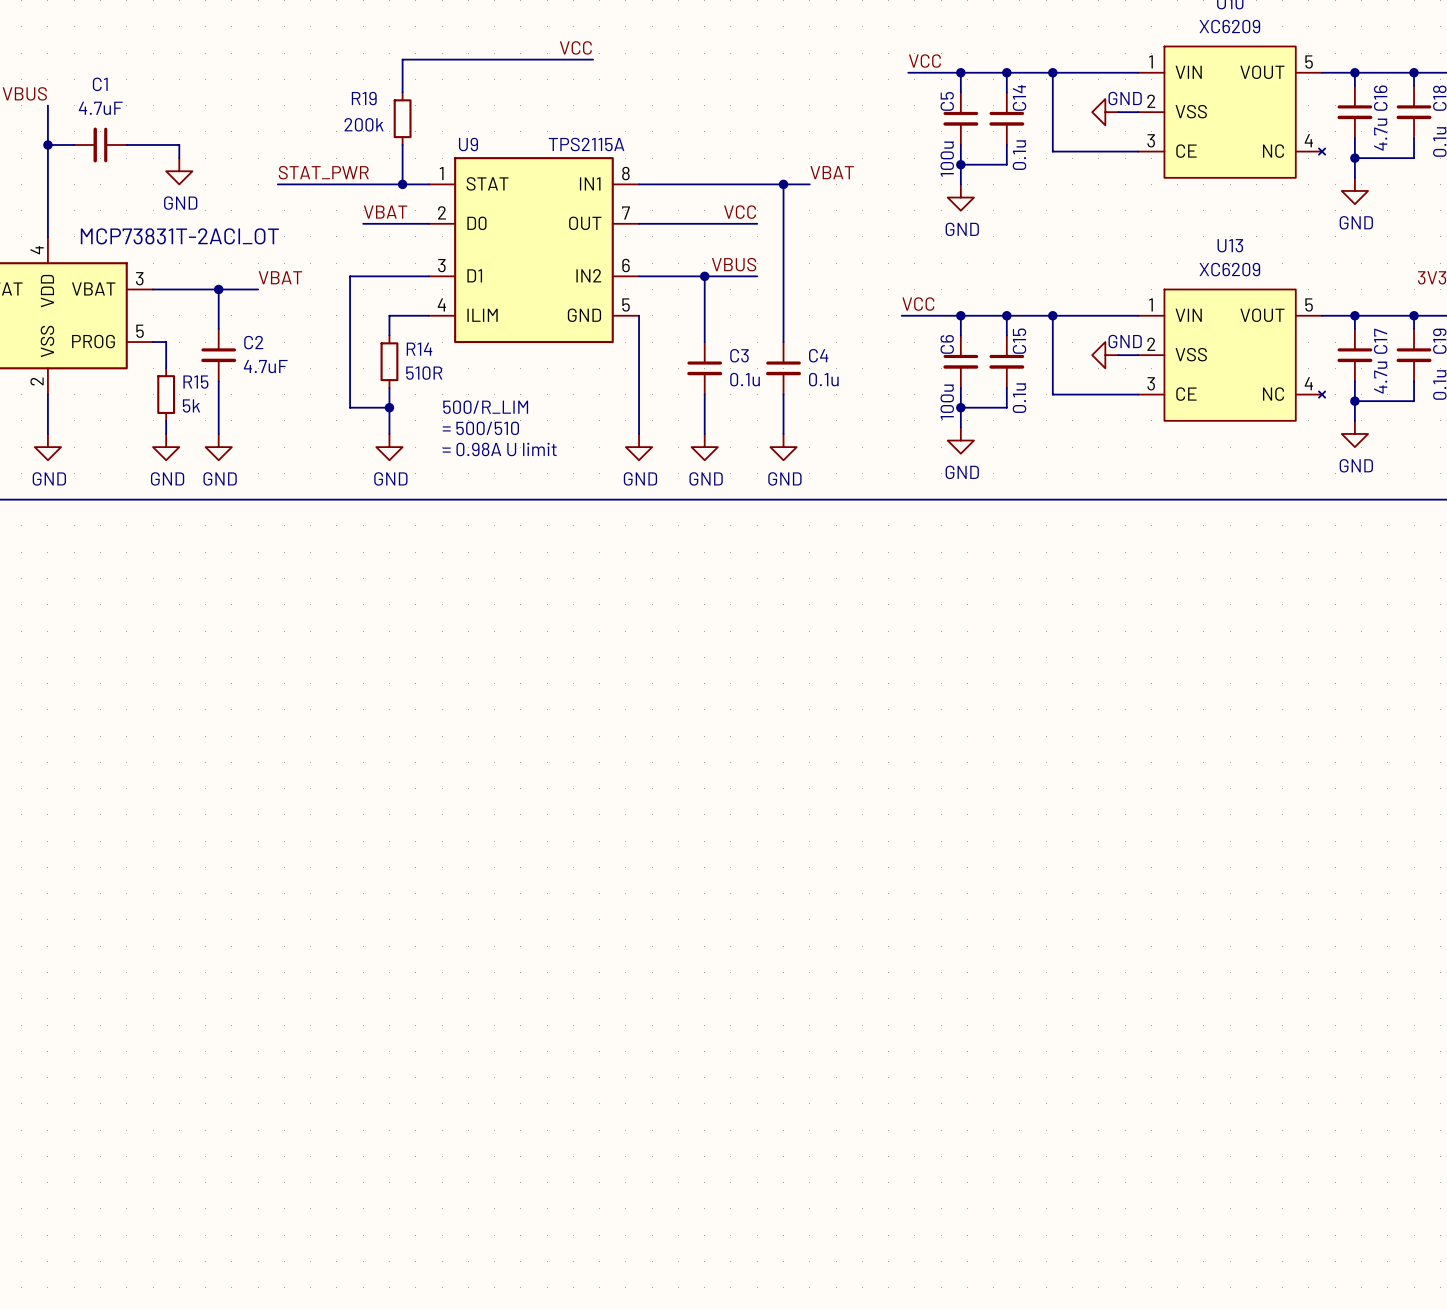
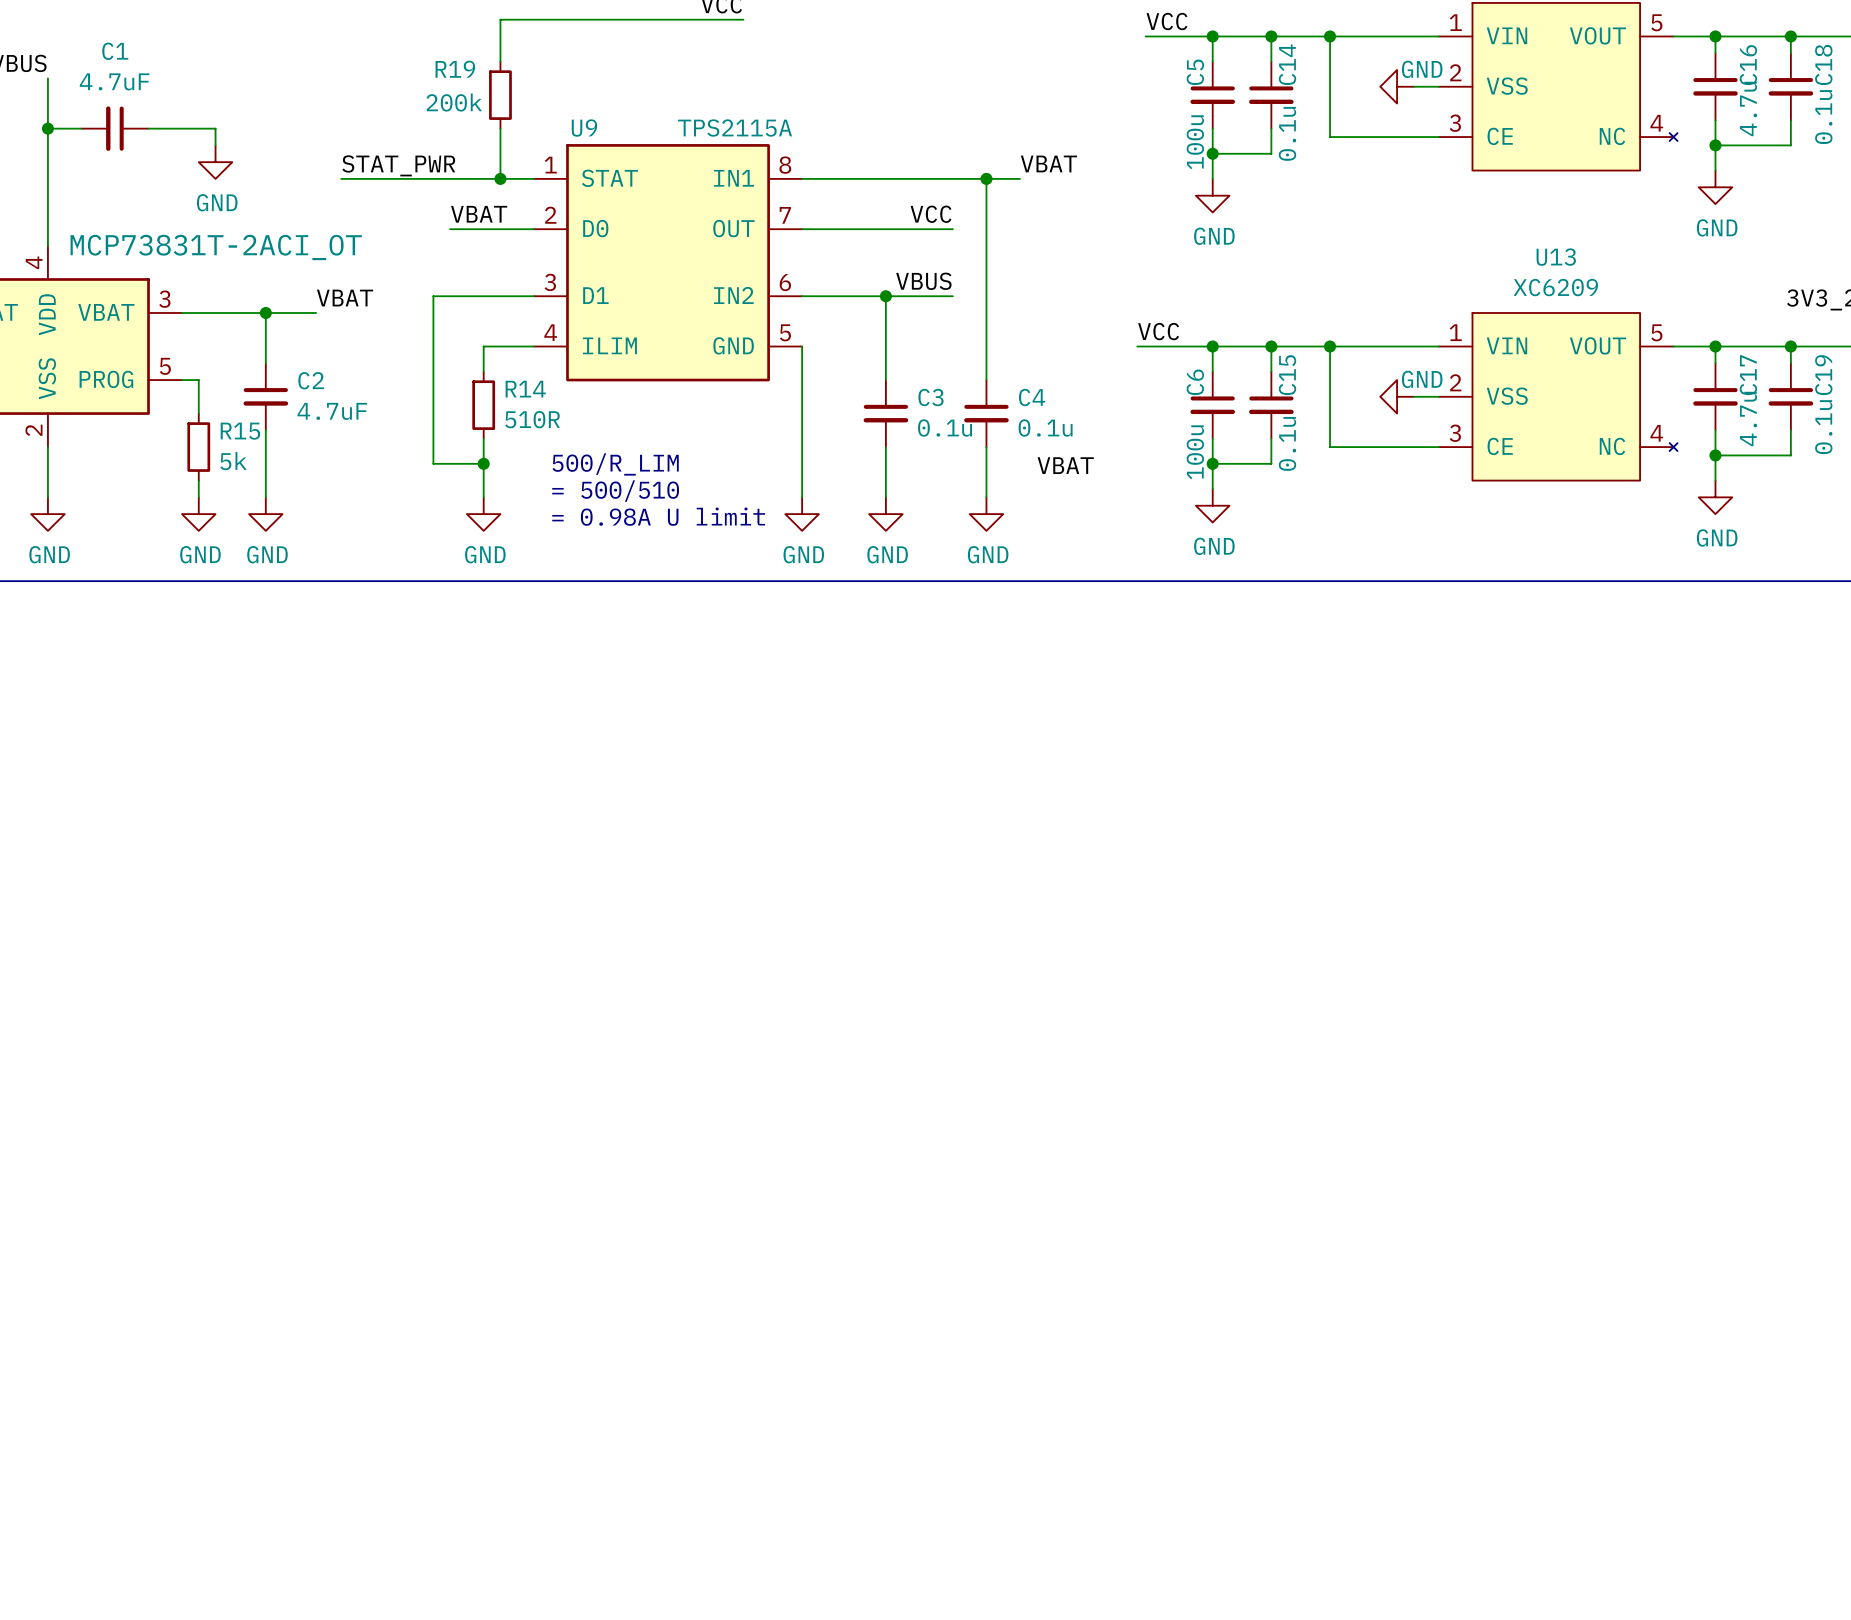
label: none -> VBAT (1065, 465)

